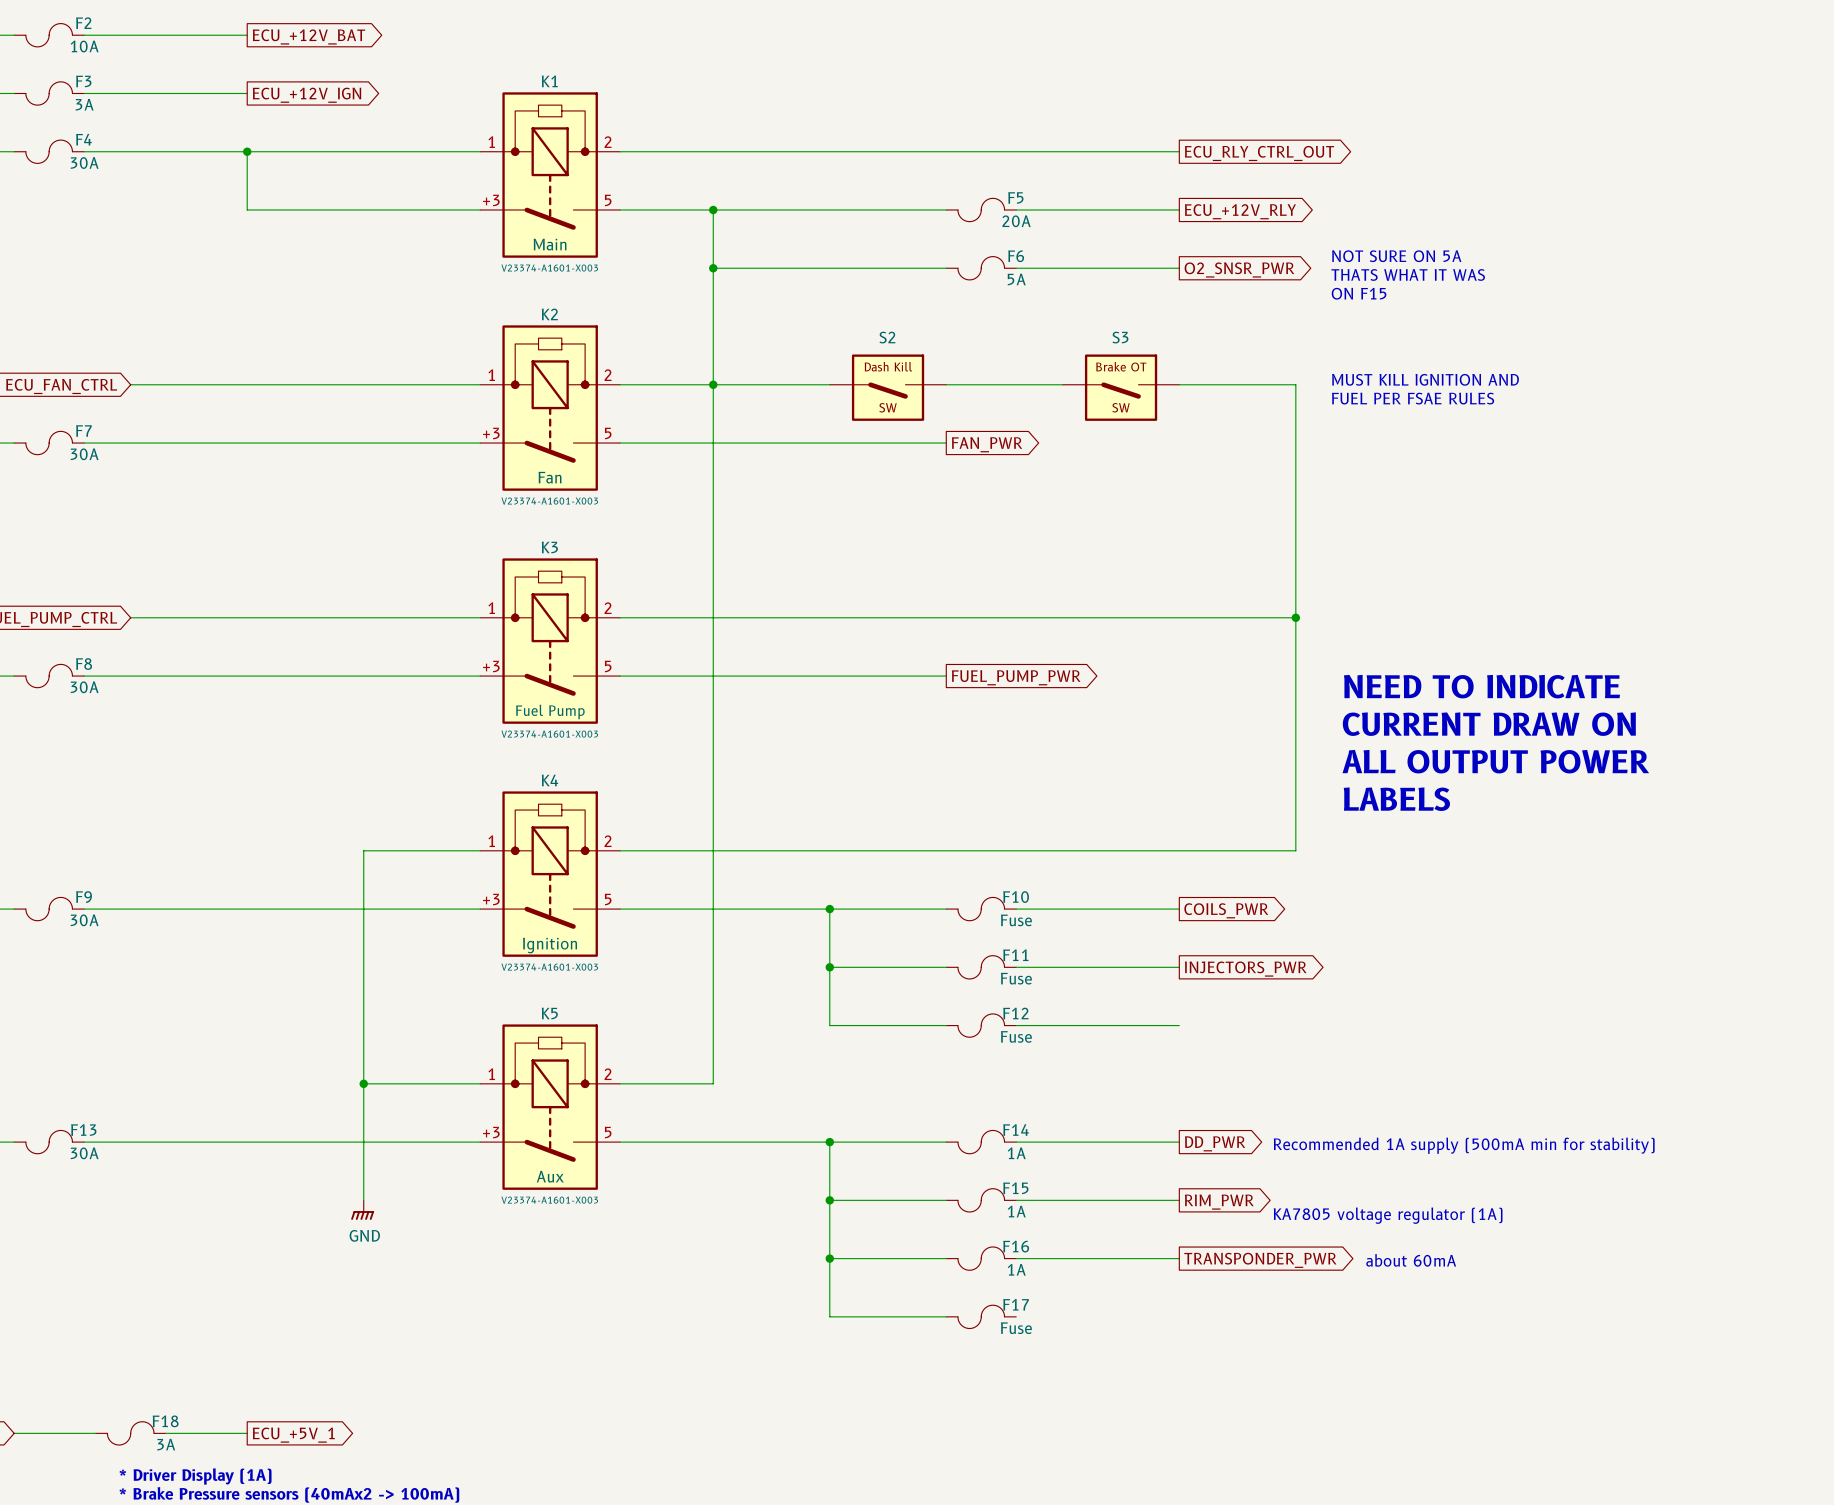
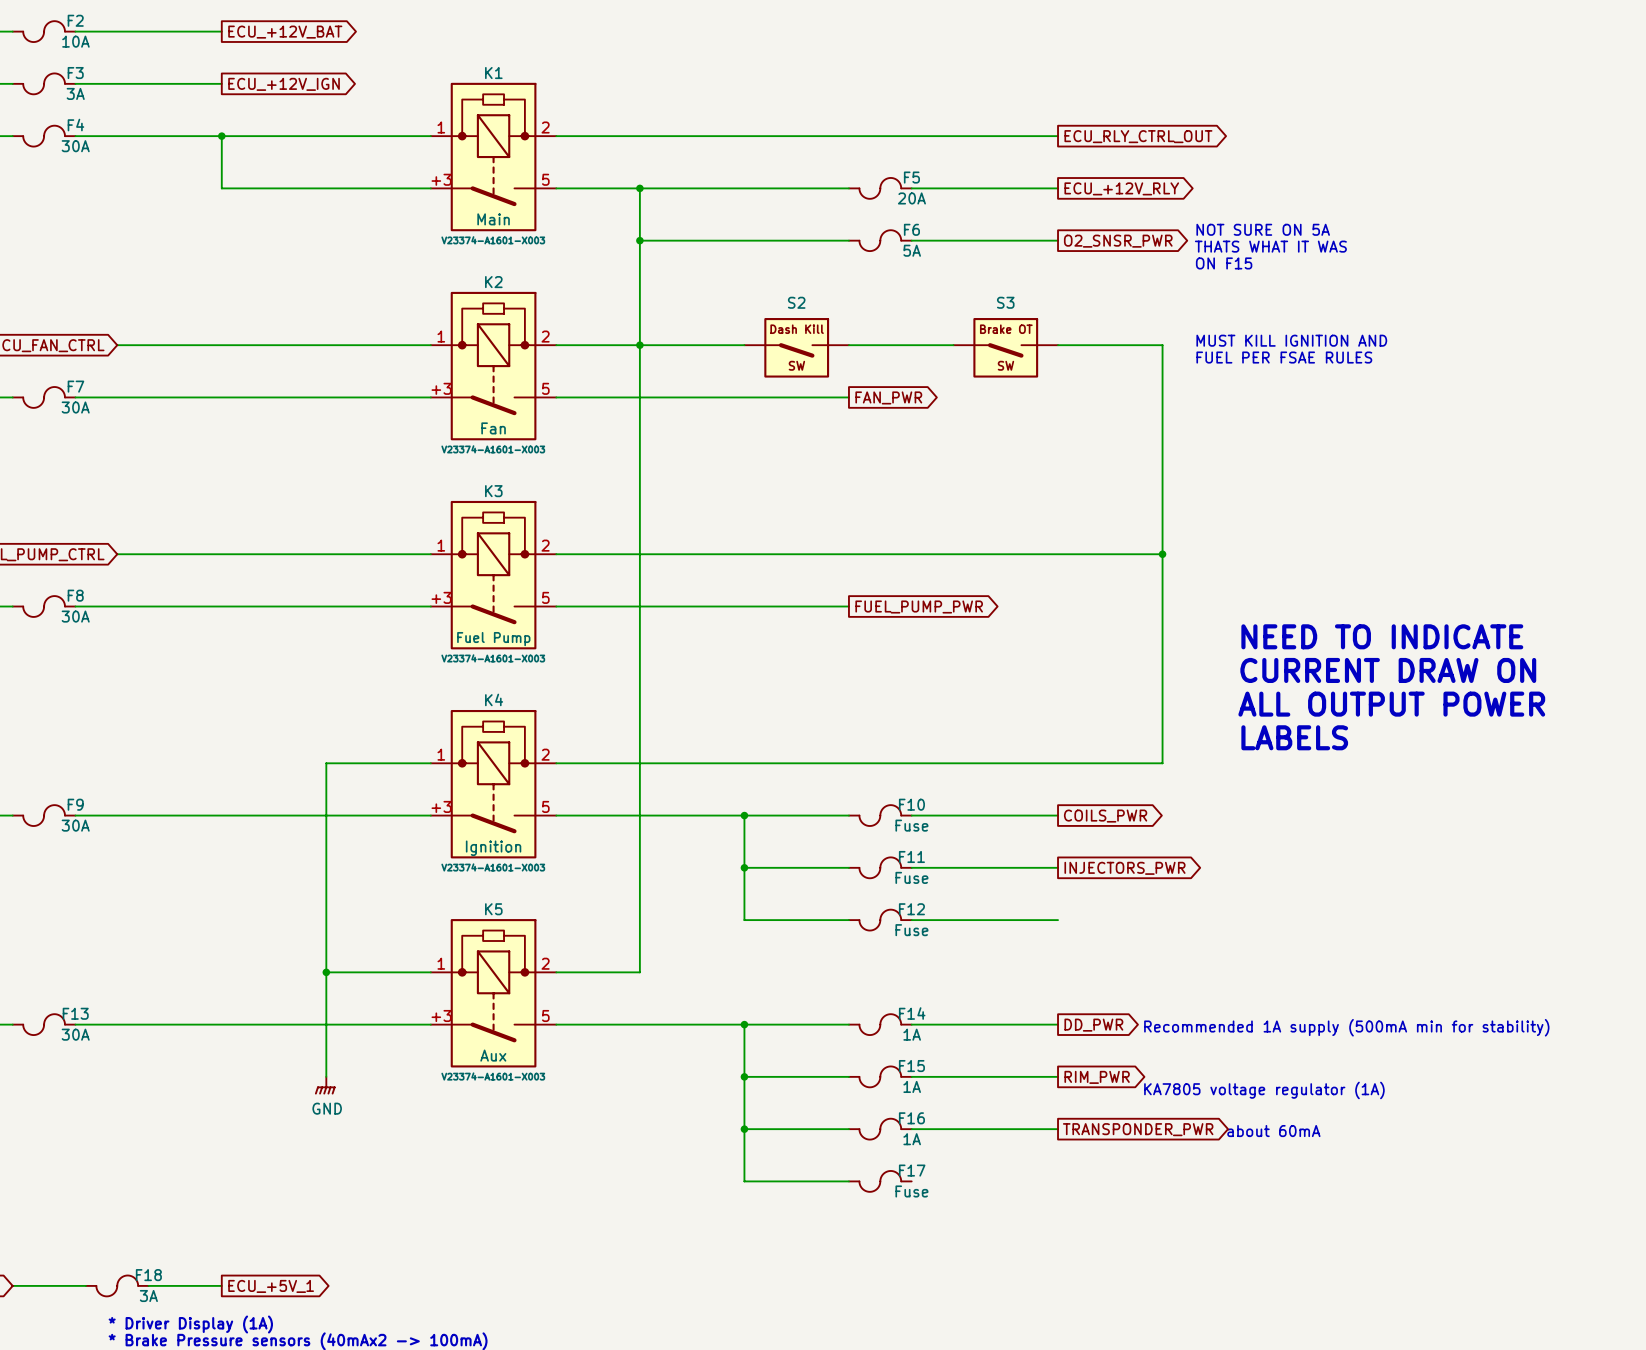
text position: NEED TO INDICATE (1481, 686) -> NEED TO INDICATE (1382, 636)
text position: CURRENT DRAW ON (1489, 724) -> CURRENT DRAW ON (1388, 670)
text position: ALL OUTPUT POWER (1495, 761) -> ALL OUTPUT POWER (1391, 704)
text position: LABELS (1396, 799) -> LABELS (1294, 737)

